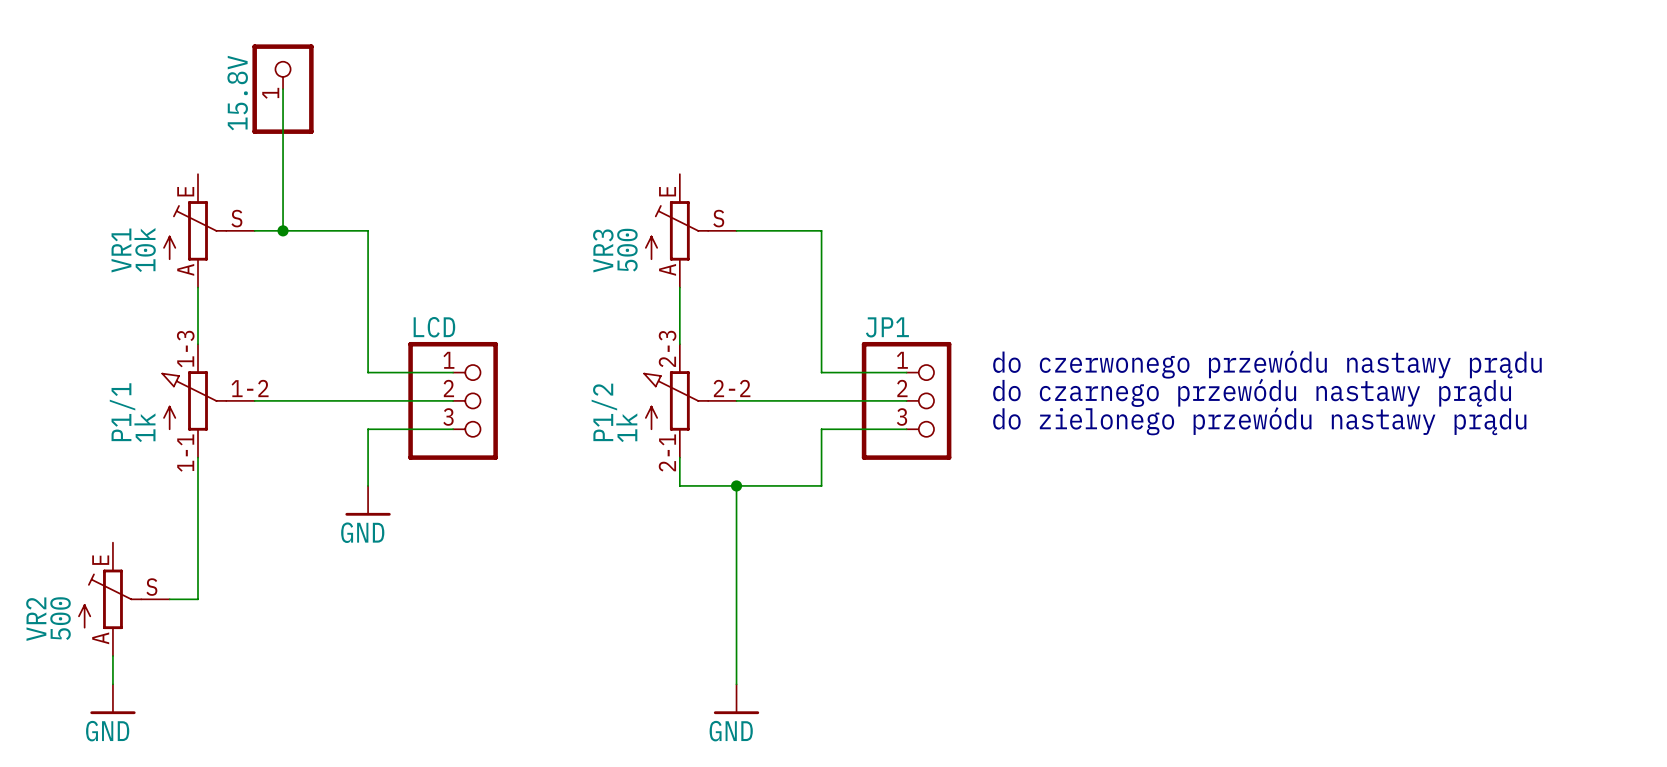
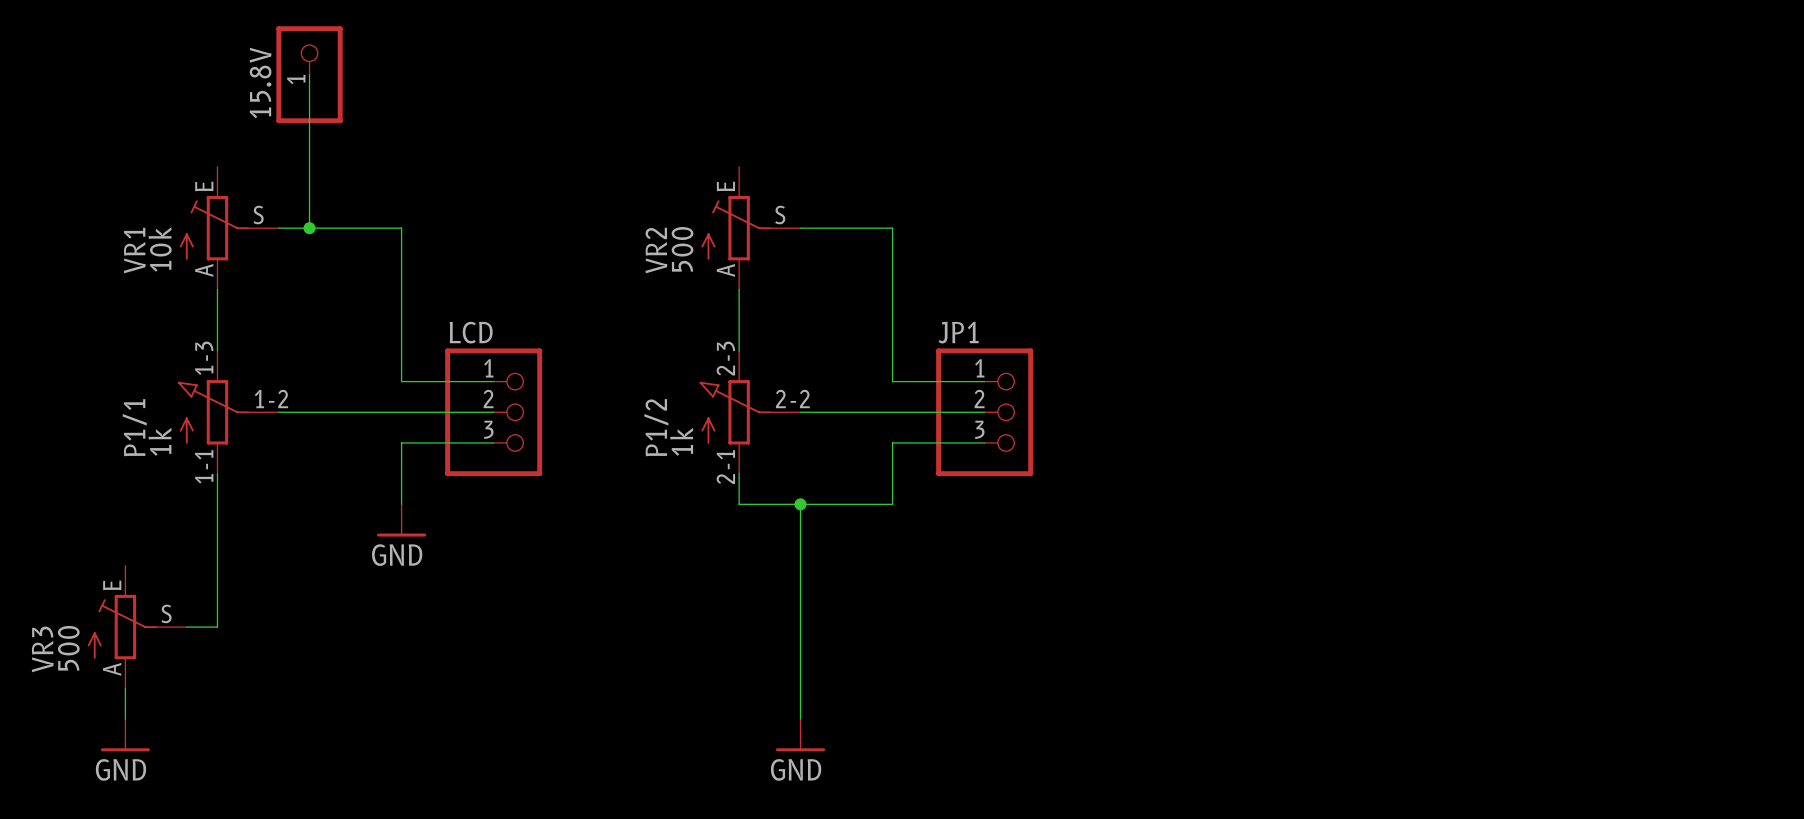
VR3 name: VR3 (603, 250) -> VR2 (656, 250)
text: do czerwonego przewódu nastawy prądu (1267, 364) -> none
text: do czarnego przewódu nastawy prądu (1252, 392) -> none
text: do zielonego przewódu nastawy prądu (1259, 421) -> none
VR2 name: VR2 (36, 619) -> VR3 (42, 649)

